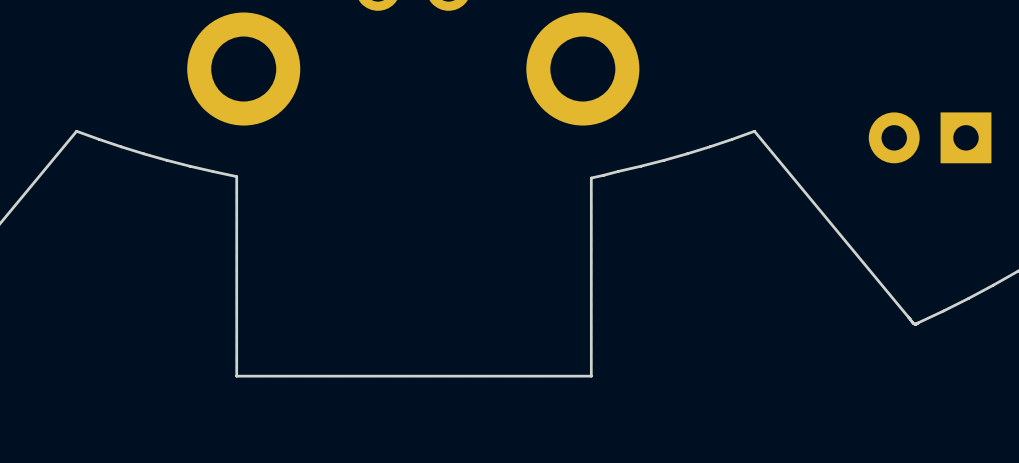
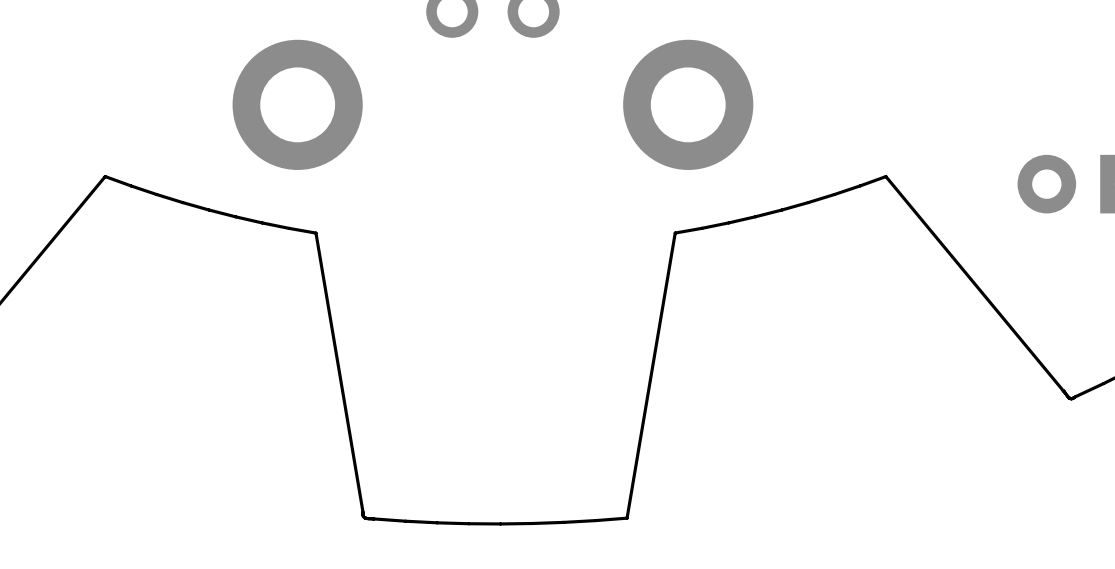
board edge: none -> (262, 222) (315, 233) (362, 512)
board edge: (618, 171) (591, 178) (591, 376) (236, 376) (236, 176) (213, 171) -> (728, 222) (675, 233) (627, 518) (500, 523) (437, 522) (366, 518)

